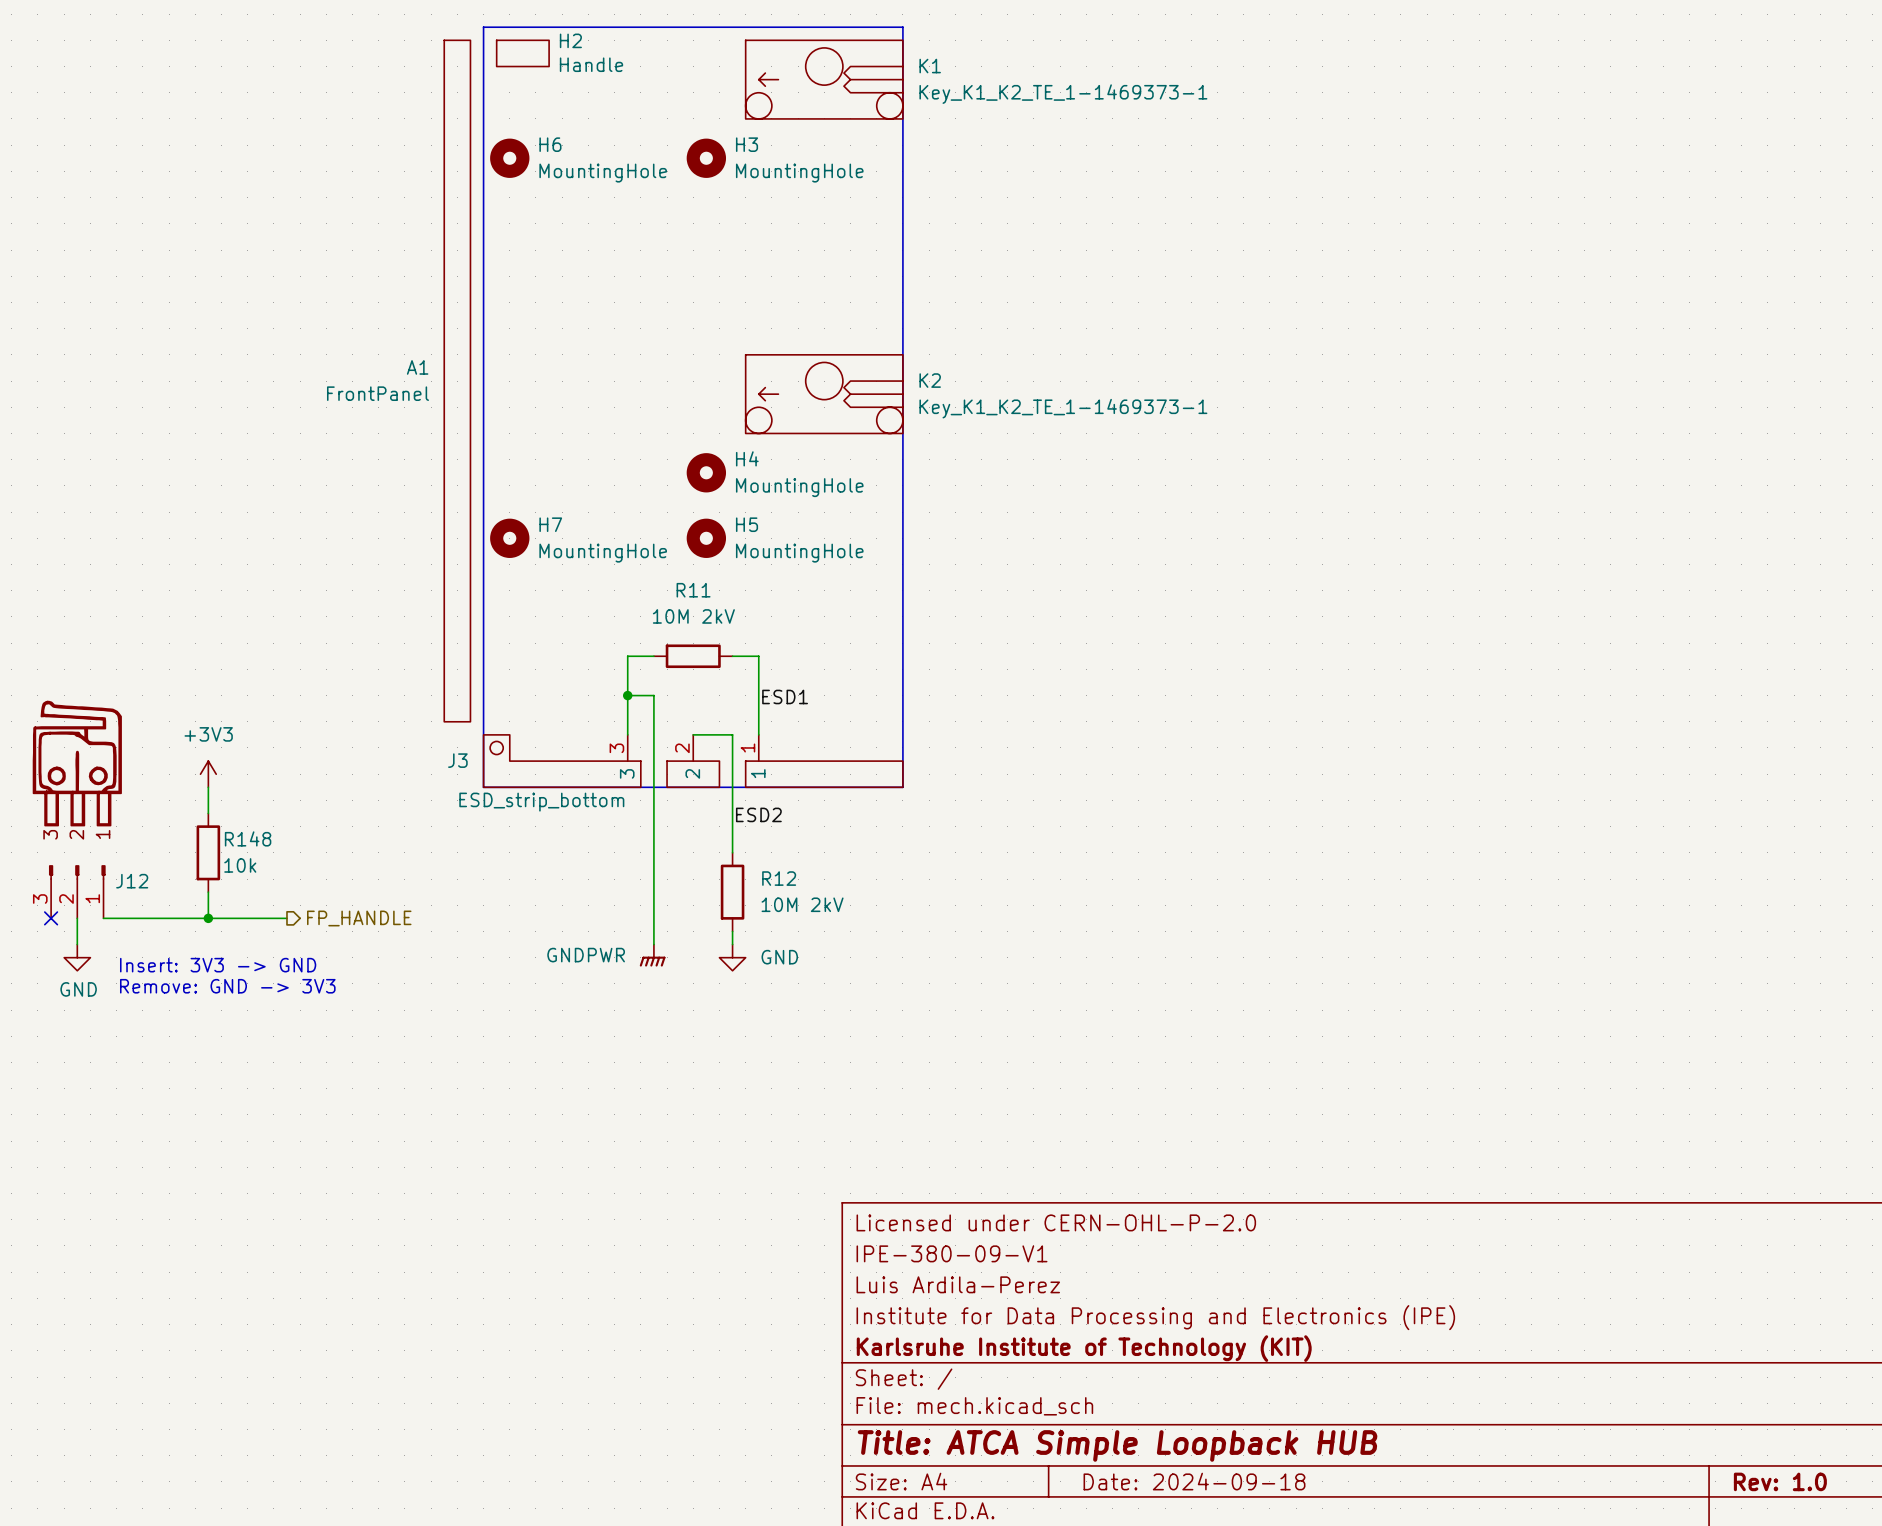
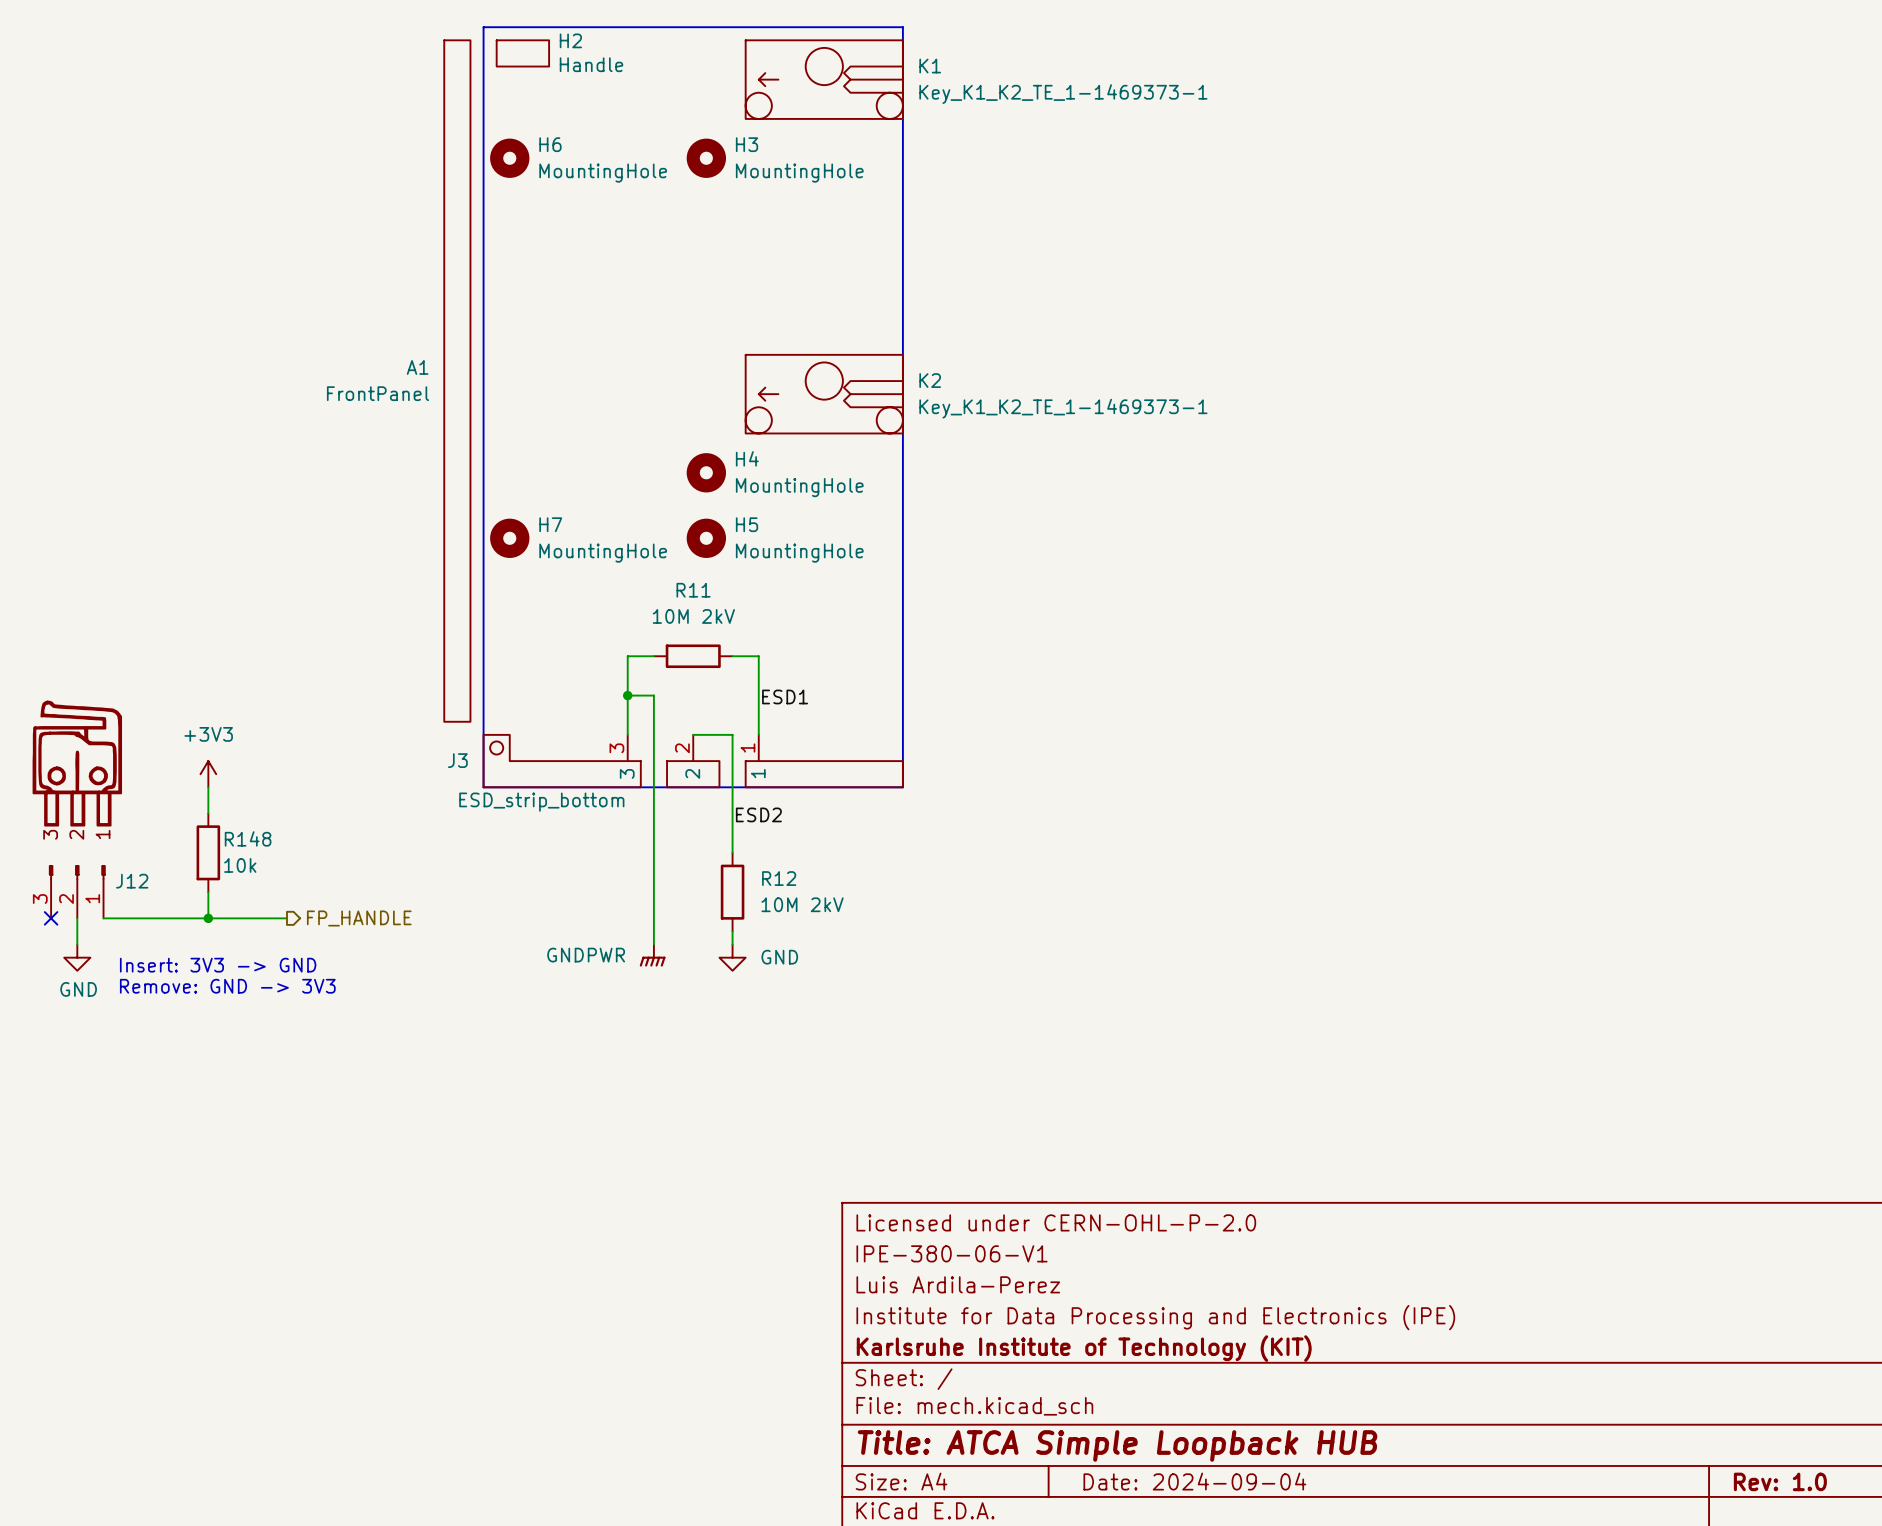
title block: IPE-380-09-V1 (952, 1253) -> IPE-380-06-V1 (952, 1253)
title block: Date: 2024-09-18 (1194, 1481) -> Date: 2024-09-04 (1194, 1481)

